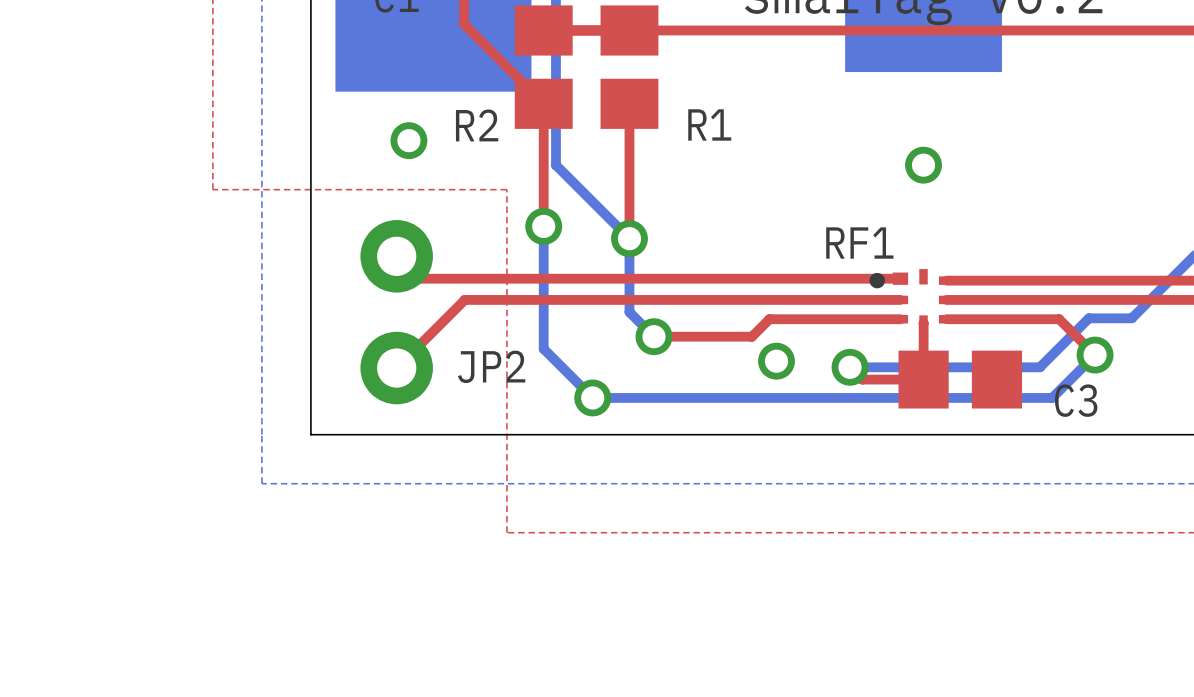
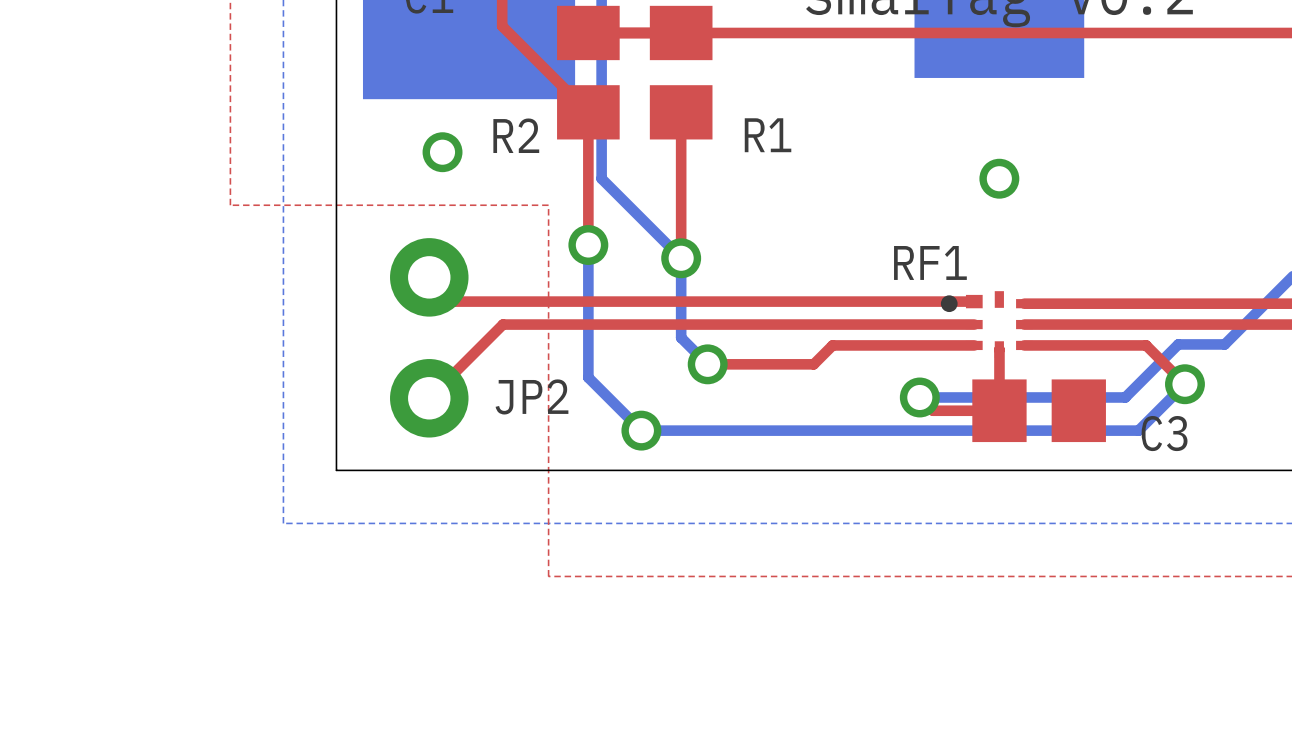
via: (776, 361) -> none

